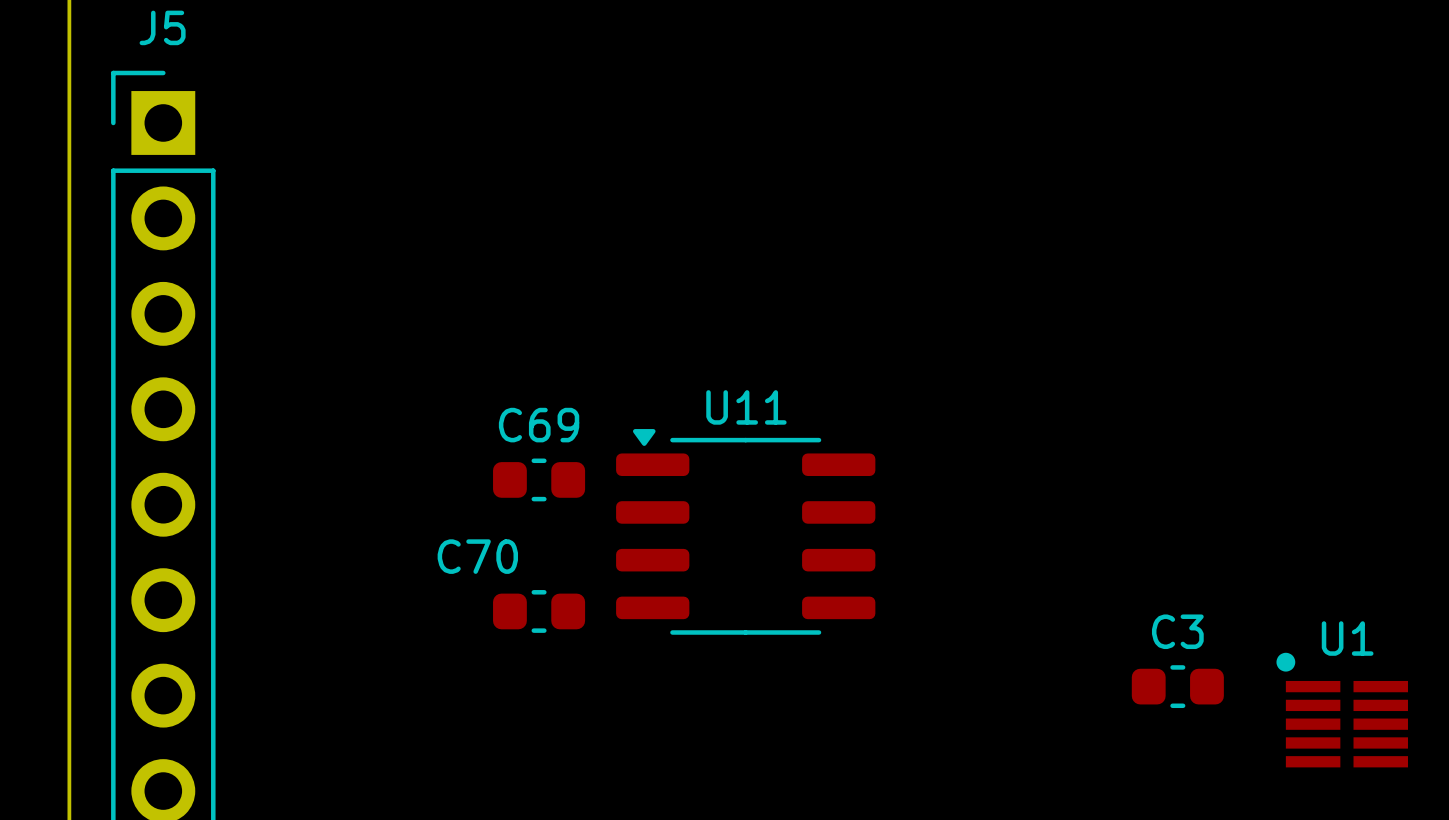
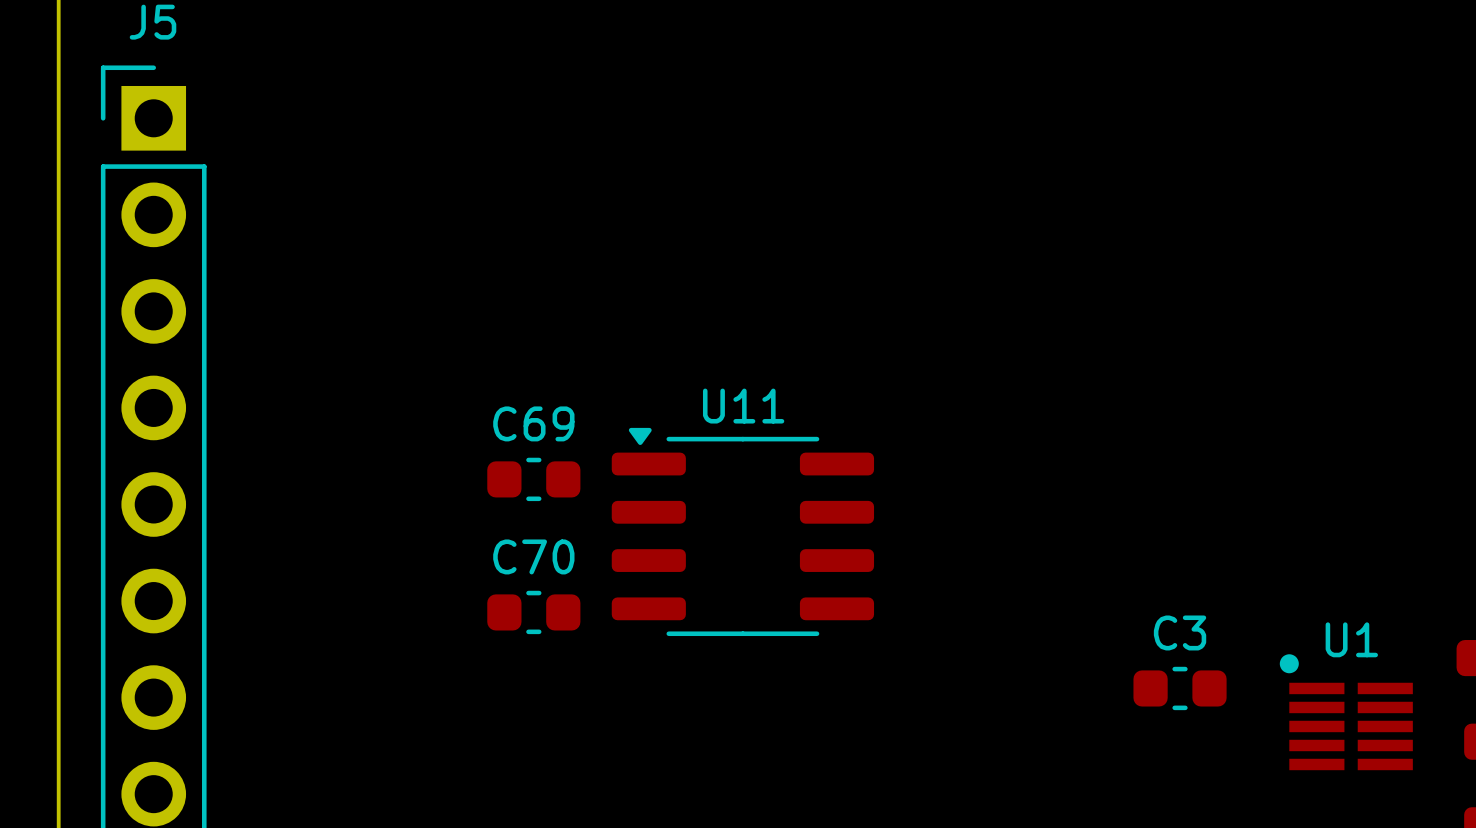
C70 name position: C70 (477, 556) -> C70 (533, 556)

